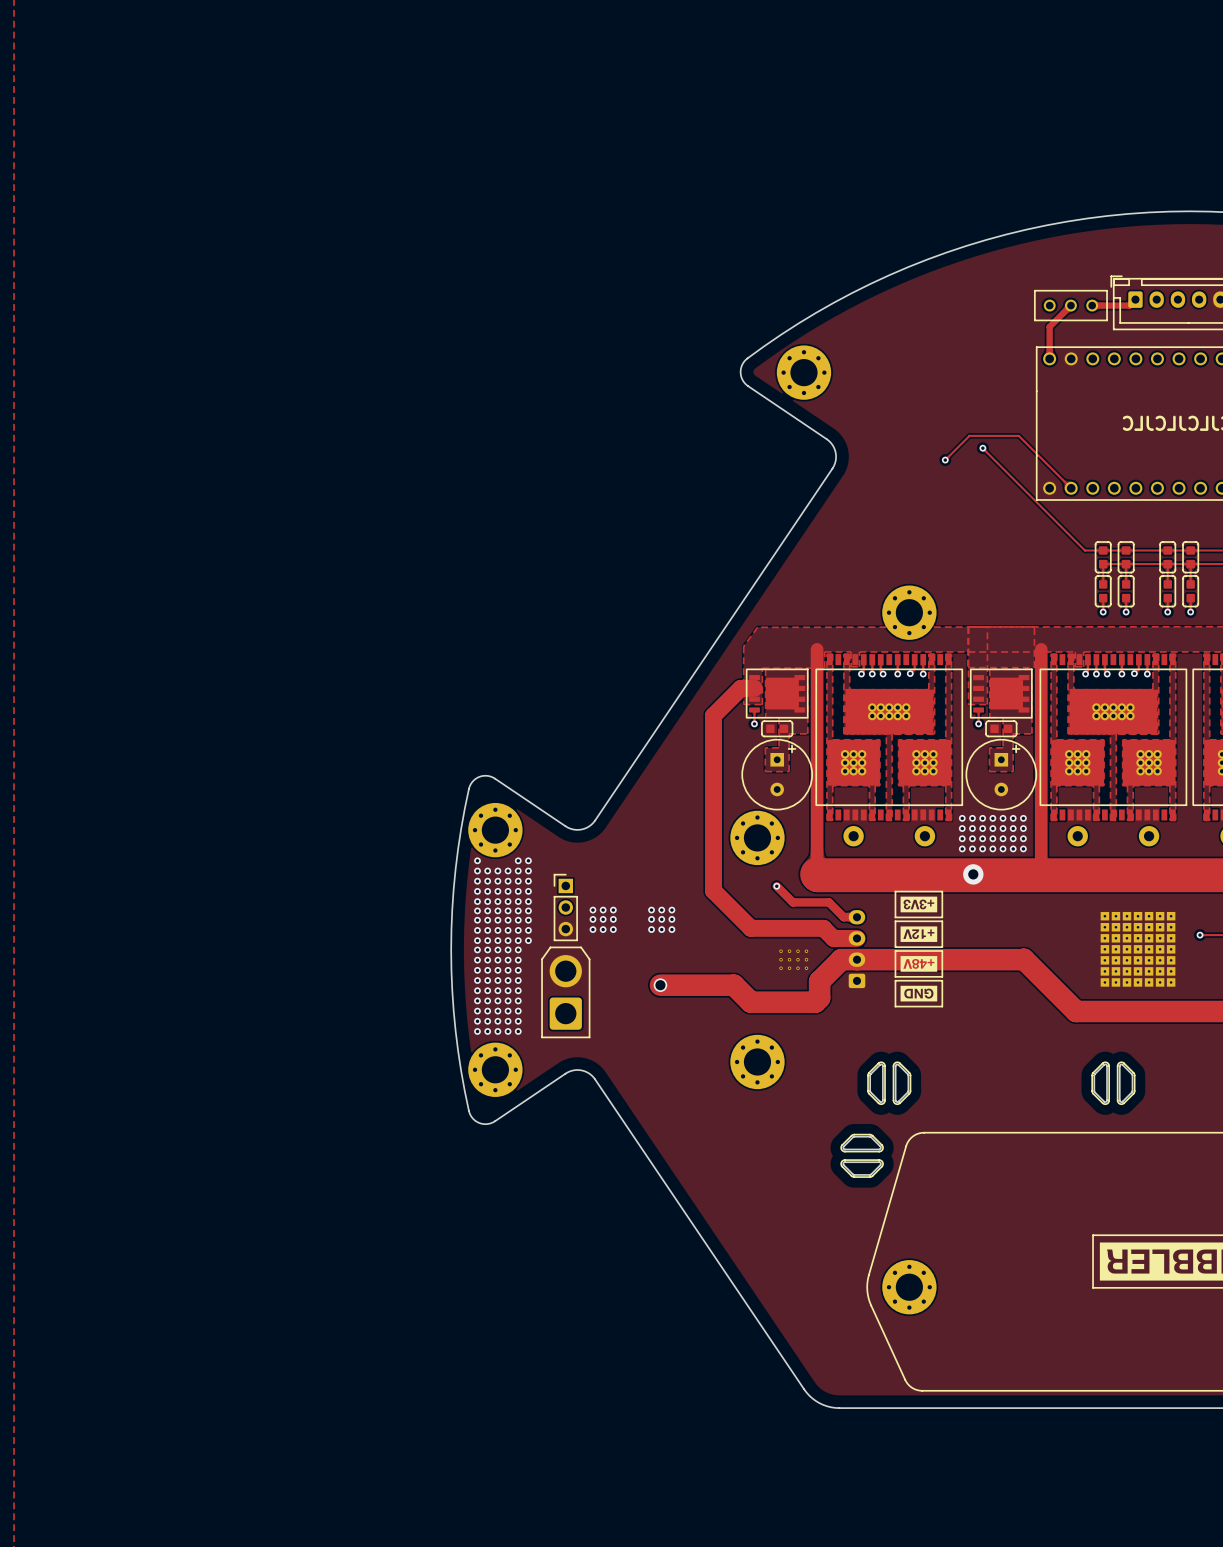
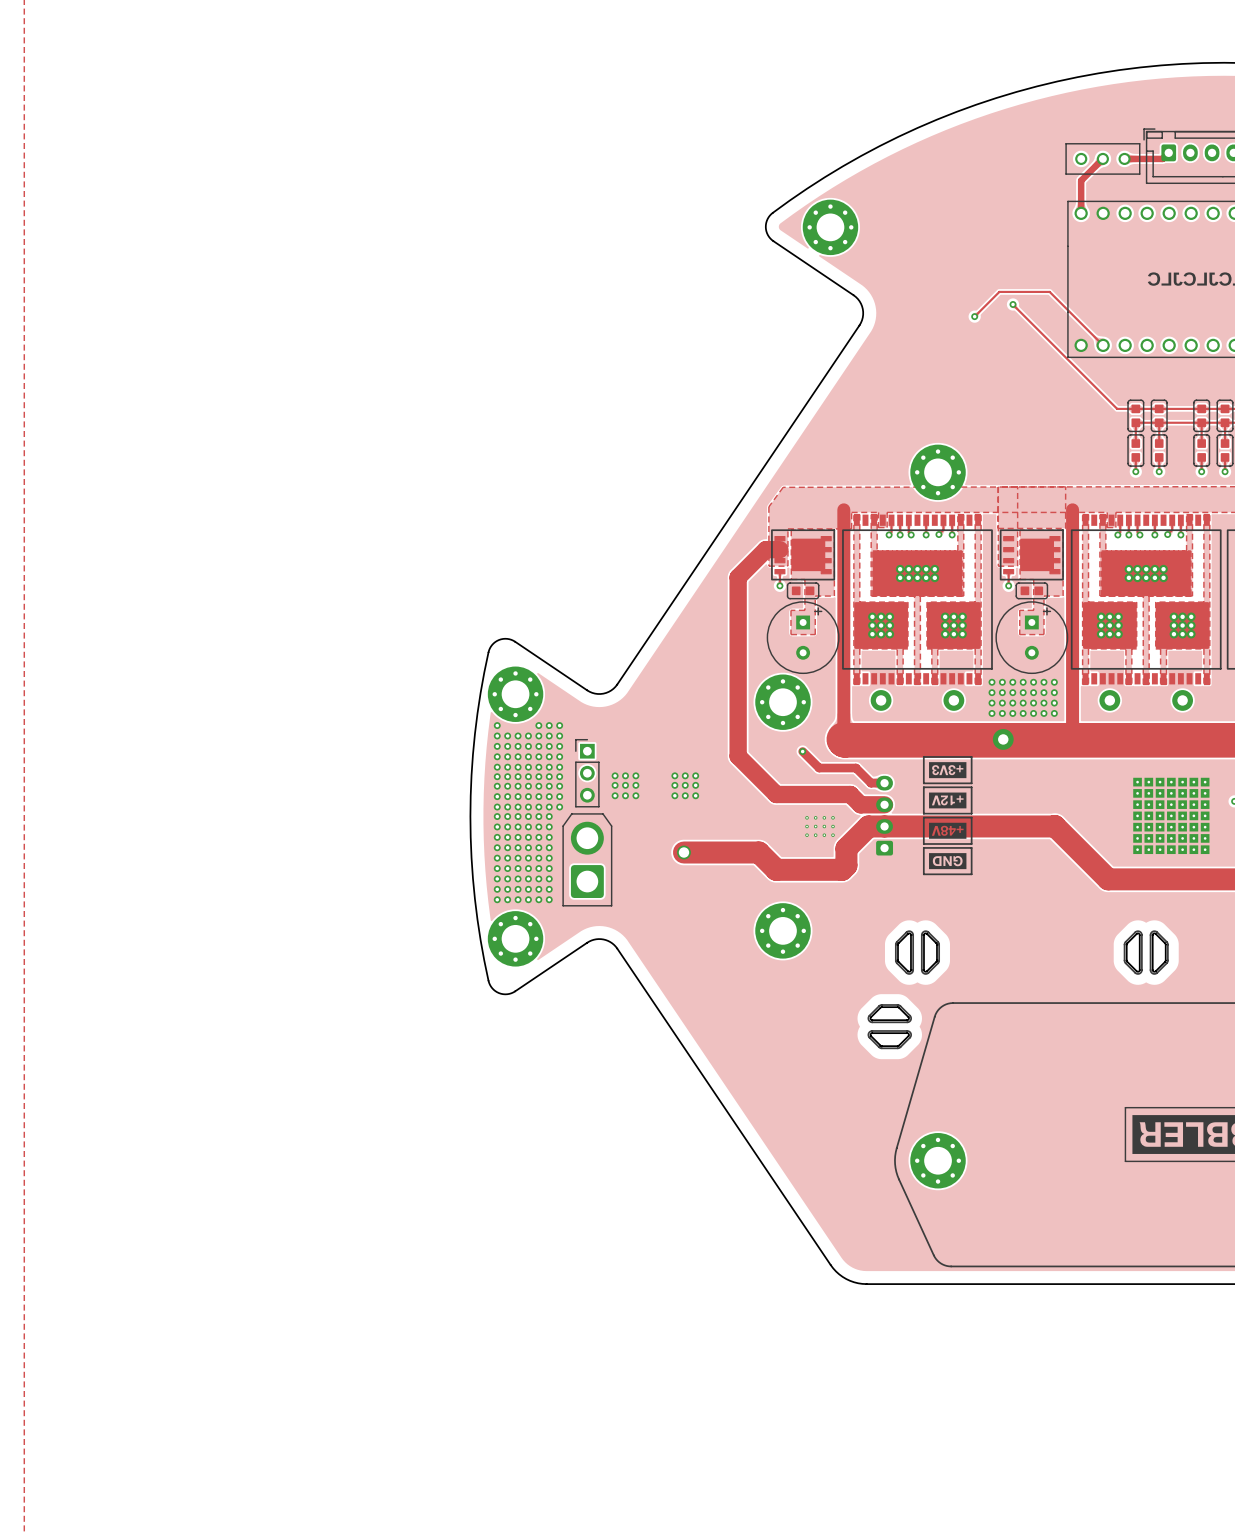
via: none -> (559, 725)
via: none -> (559, 735)
via: none -> (559, 746)
via: none -> (559, 756)
via: none -> (559, 767)
via: none -> (559, 776)
via: none -> (559, 786)
via: none -> (559, 796)
via: none -> (559, 807)
via: none -> (549, 816)
via: none -> (549, 826)
via: none -> (549, 837)
via: none -> (549, 847)
via: none -> (549, 858)
via: none -> (549, 868)
via: none -> (549, 878)
via: none -> (549, 889)
via: none -> (549, 899)

